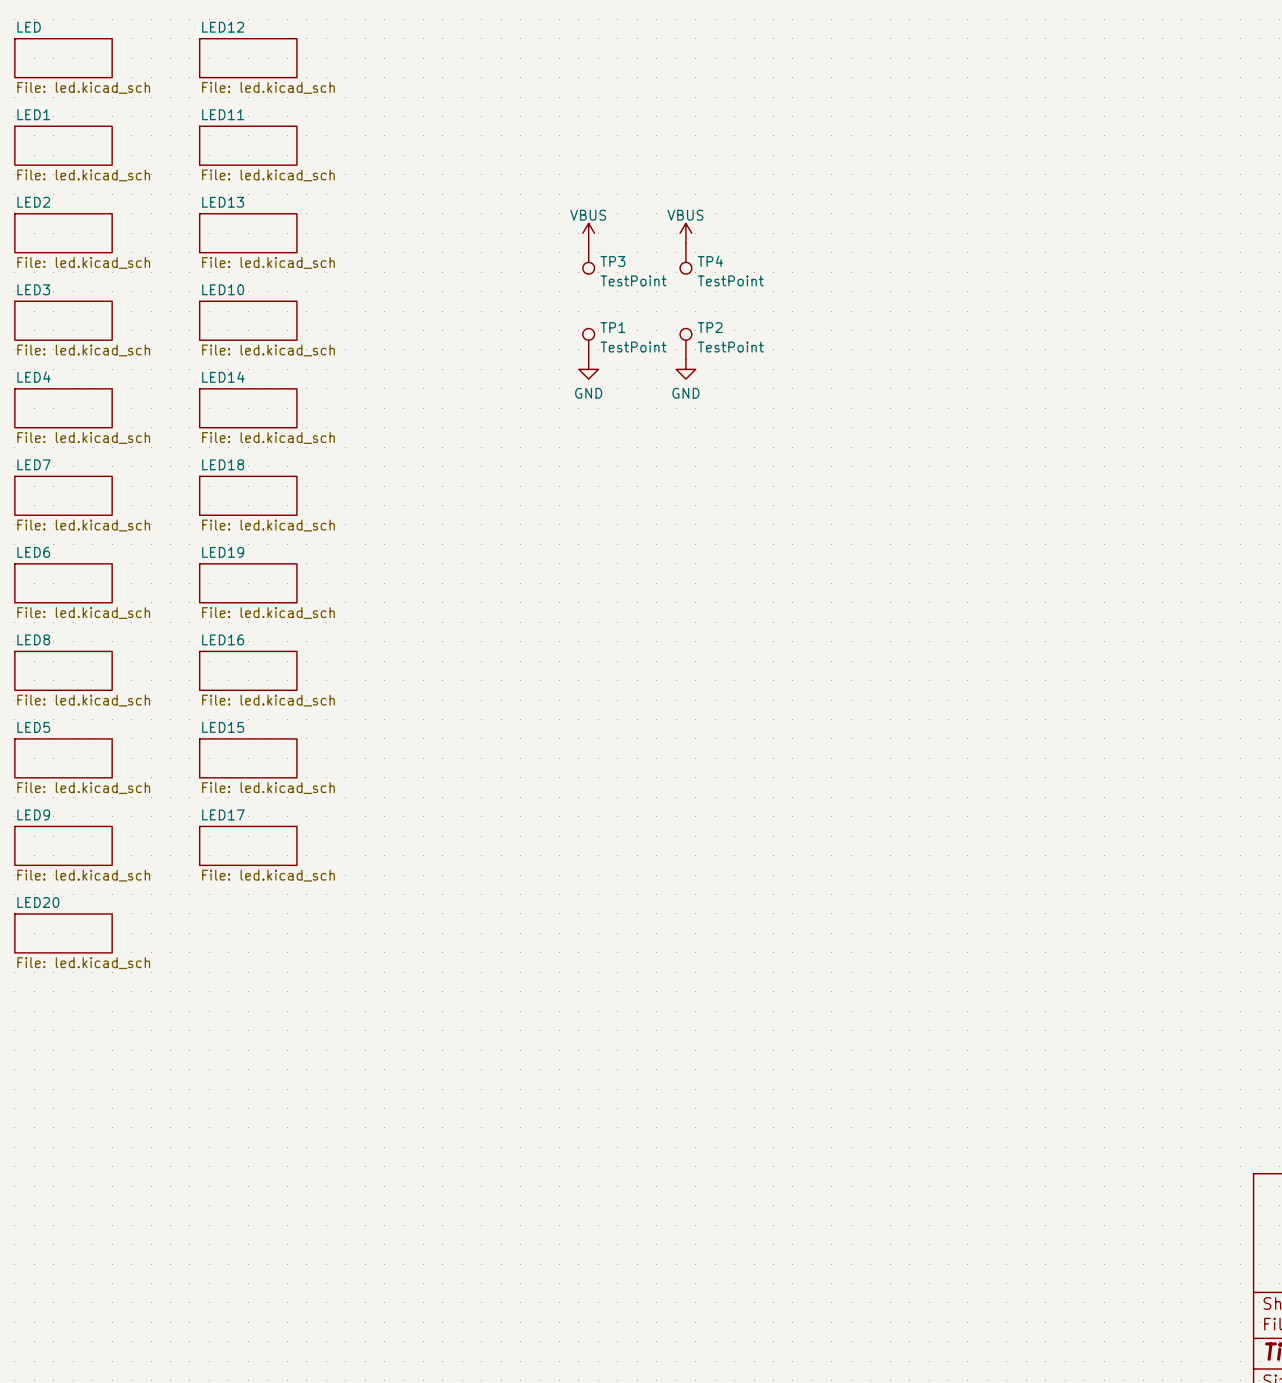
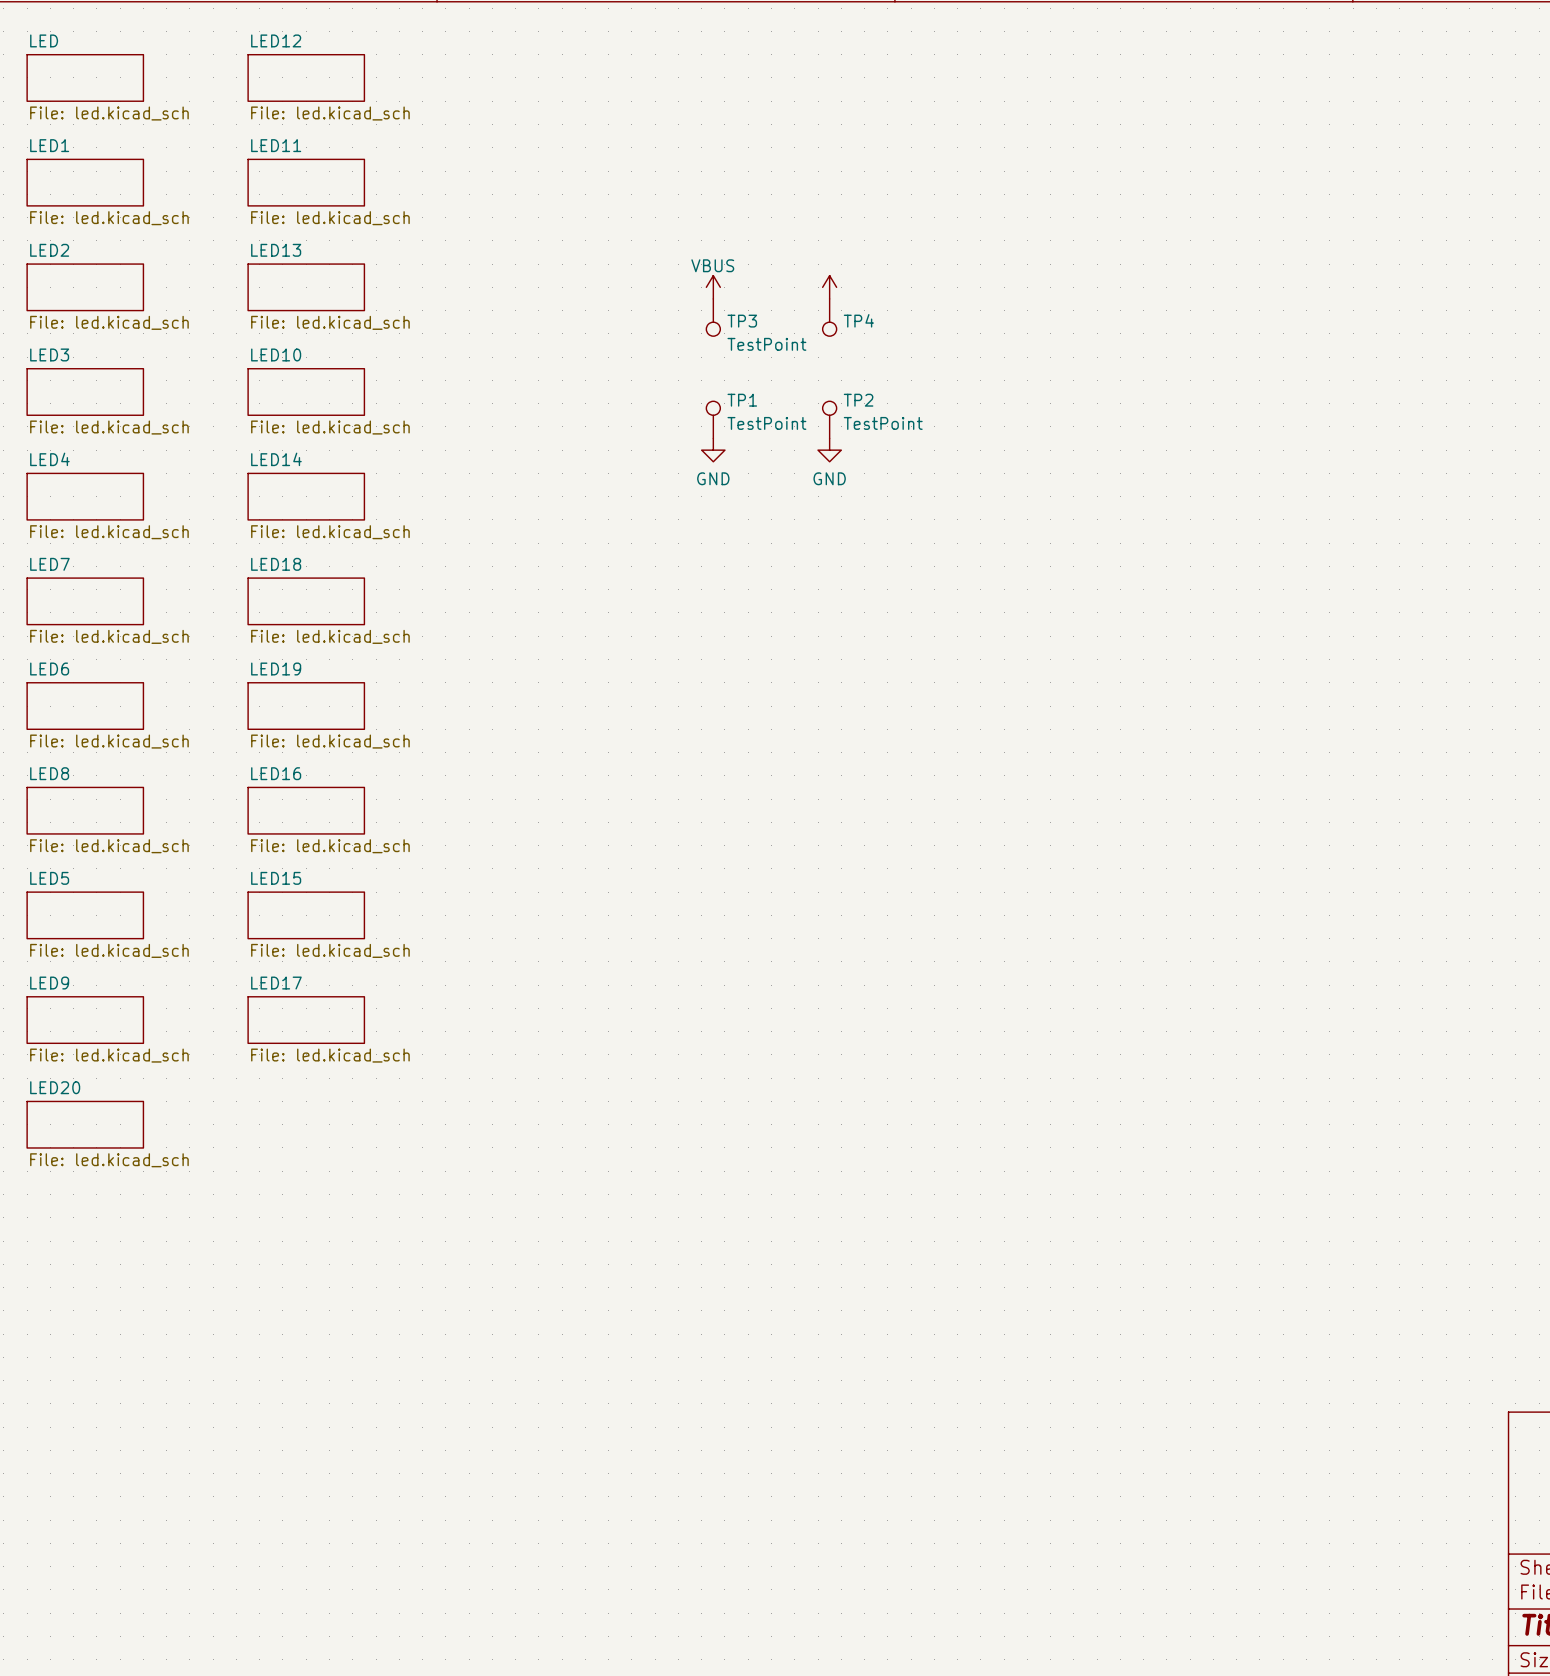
power symbol text: VBUS (685, 215) -> none
TP4 value: TestPoint (730, 280) -> none

